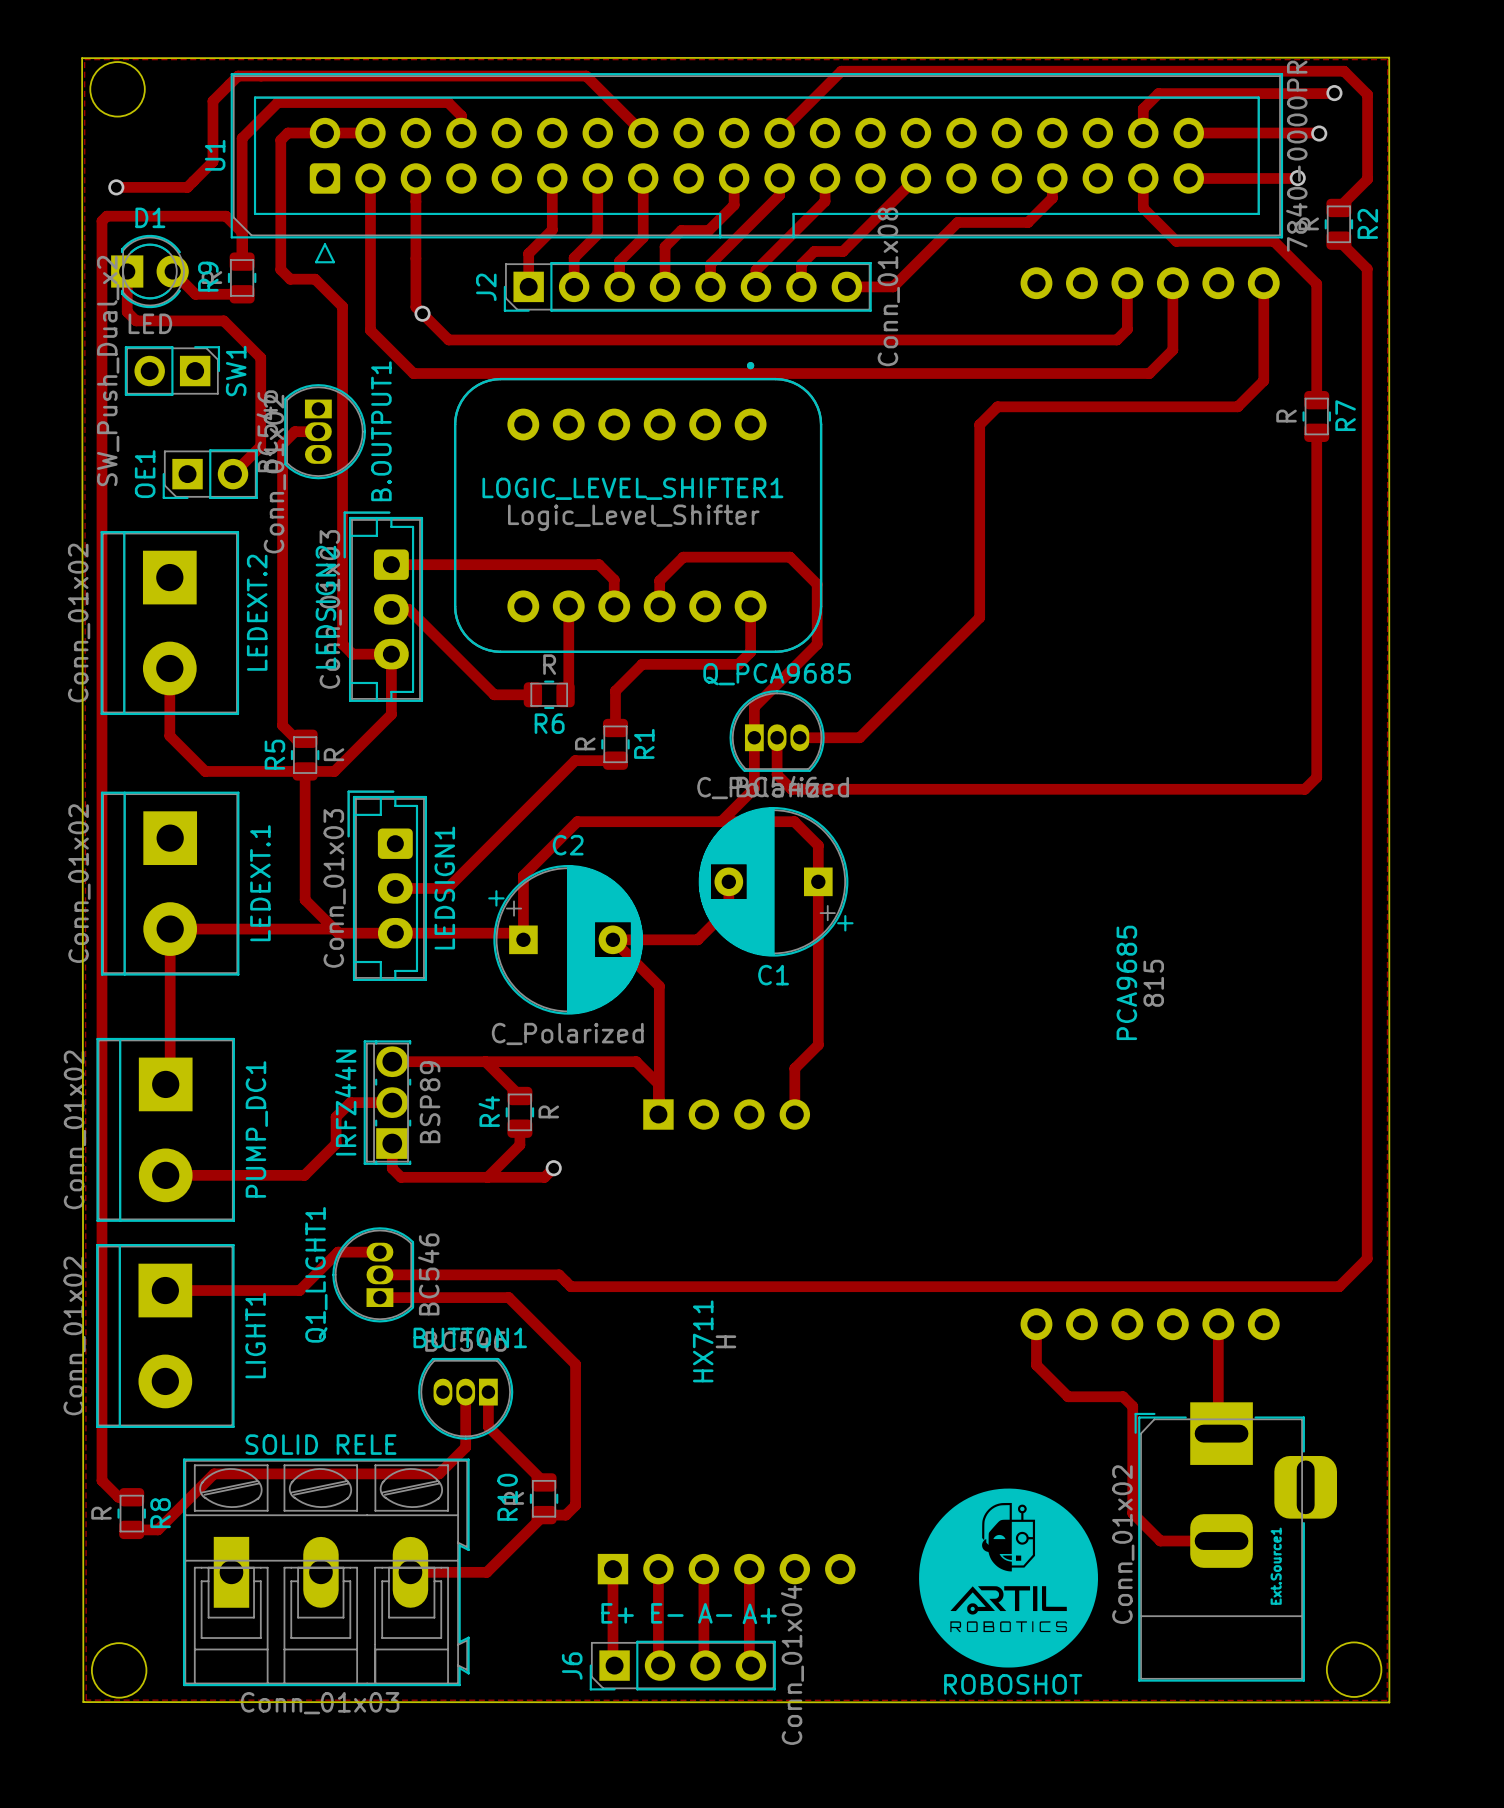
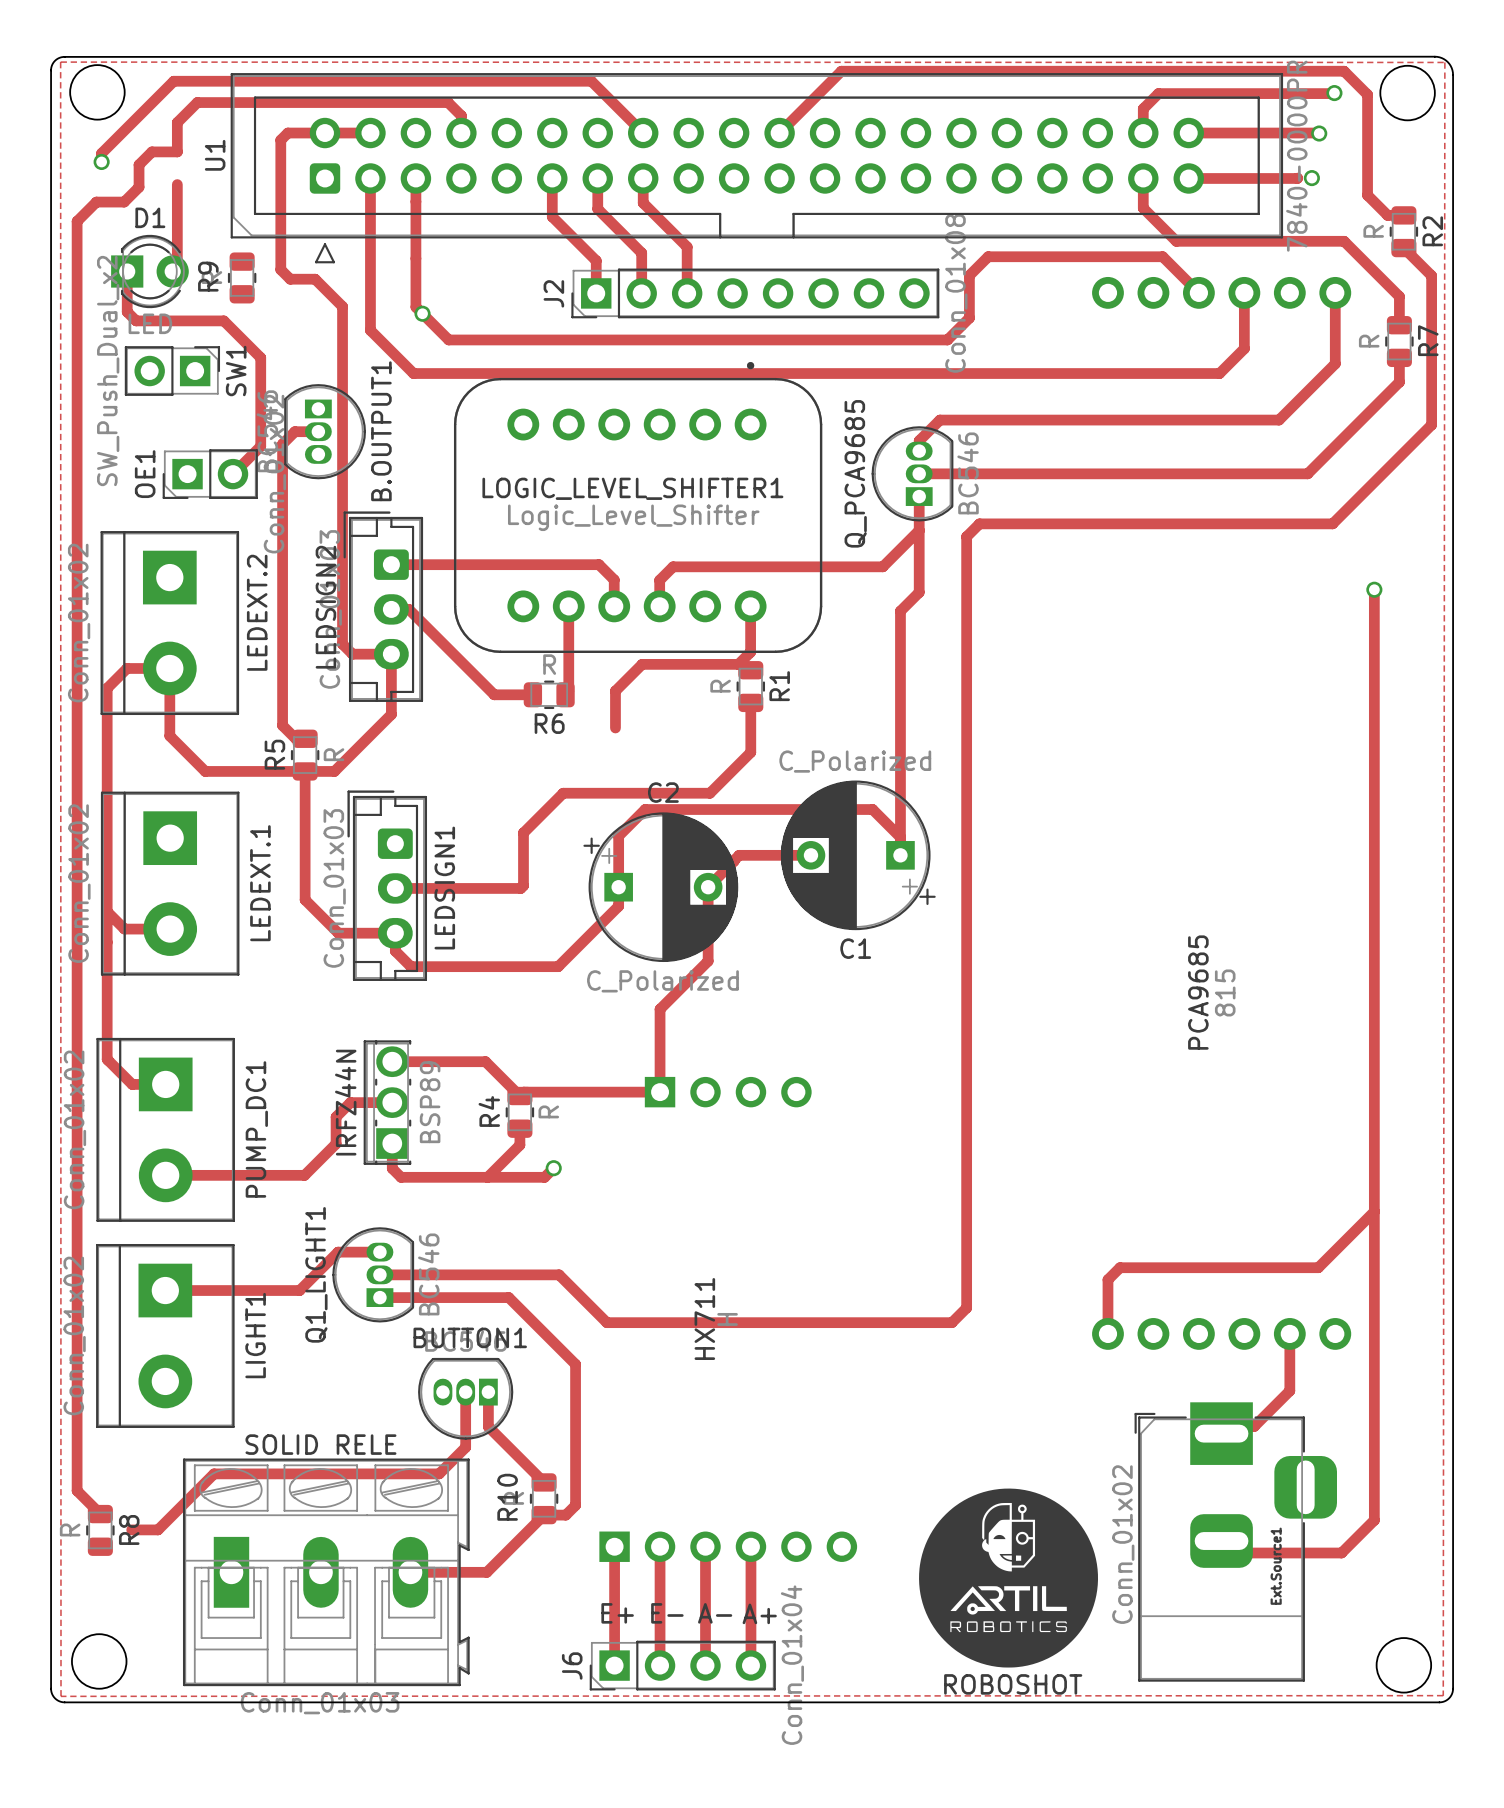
board edge: (1389, 57) (82, 58) (83, 1702) (1389, 1702) (1389, 57) -> (1434, 56) (64, 56) (54, 61) (51, 70) (51, 1688) (56, 1699) (64, 1702) (1439, 1702) (1450, 1697) (1453, 1688) (1453, 74) (1447, 62) (1434, 56)
zone outline: (84, 59) (86, 1700) (1387, 1700) (1387, 59) (84, 59) -> (60, 62) (61, 1696) (1443, 1695) (1444, 62) (60, 62)
round board edge: none -> [1379, 64, 1436, 122]
track: (591, 81) (586, 76) (238, 76) (212, 101) (212, 161) (187, 187) (116, 187) -> (591, 81) (173, 81) (101, 153) (101, 161)
round board edge position: (117, 89) -> (97, 92)
track: (277, 102) (242, 138) (242, 261) -> (277, 102) (197, 102) (177, 122) (177, 151) (151, 151) (139, 164) (139, 187) (124, 202) (96, 202) (77, 221) (77, 1490) (100, 1514)
track: (734, 178) (734, 205) (708, 230) (681, 230) (665, 246) (665, 286) -> none
track: (779, 178) (779, 195) (710, 264) (710, 286) -> none
track: (825, 178) (825, 201) (755, 270) (755, 286) -> none
track: (915, 178) (843, 251) (814, 251) (801, 264) (801, 286) -> none
track: (1052, 178) (1052, 198) (1028, 222) (957, 222) (893, 286) (846, 286) -> none
via position: (1297, 178) -> (1311, 178)
track: (1367, 179) (1338, 207) -> (1367, 179) (1367, 195) (1387, 215) (1403, 215)
via position: (116, 187) -> (101, 161)
track: (643, 203) (643, 237) (619, 261) (619, 286) -> (643, 203) (687, 246) (687, 293)
track: (597, 209) (597, 234) (574, 257) (574, 286) -> (597, 209) (641, 252) (641, 293)
track: (552, 216) (552, 229) (528, 253) (528, 286) -> (552, 216) (596, 260) (596, 293)
R2 position: (1338, 224) -> (1403, 231)
track: (242, 232) (226, 216) (106, 216) (101, 221) (101, 1480) (118, 1497) (131, 1497) -> none
track: (1338, 240) (1367, 268) (1367, 1258) (1339, 1286) (570, 1286) -> (1403, 248) (1431, 275) (1431, 424) (1332, 523) (979, 523) (966, 536) (966, 1307) (951, 1322) (606, 1322) (570, 1286)
track: (1273, 241) (1316, 284) (1316, 400) -> (1273, 241) (1344, 241) (1399, 296) (1399, 325)
track: (172, 271) (195, 294) (242, 294) -> (172, 271) (177, 266) (177, 184)
track: (1127, 283) (1127, 329) (1116, 339) (947, 339) -> (1198, 292) (1162, 256) (988, 256) (969, 275) (969, 318) (947, 339)
track: (1172, 283) (1172, 350) (1149, 373) -> (1244, 292) (1244, 348) (1219, 373) (1149, 373)
track: (1263, 283) (1263, 380) (1237, 406) (997, 406) (979, 424) (979, 617) (859, 737) (799, 737) -> none
J2 position: (687, 286) -> (755, 293)
track: none -> (1335, 292) (1335, 363) (1279, 420) (939, 420) (919, 440) (919, 451)
track: none -> (1399, 357) (1399, 382) (1307, 473) (919, 473)
R7 position: (1316, 416) -> (1399, 341)
track: (1316, 432) (1316, 777) (1304, 789) (791, 789) (777, 774) (777, 737) -> none
track: none -> (919, 496) (919, 592) (900, 611) (900, 855)
track: (659, 580) (683, 557) (789, 557) (817, 584) (817, 644) (754, 707) (754, 788) (721, 821) -> (659, 580) (673, 566) (882, 566) (919, 530)
track: none -> (1374, 589) (1374, 1520) (1341, 1553) (1248, 1553) (1229, 1533)
via: none -> (1374, 589)
Q_PCA9685 rotation: 0° (777, 731) -> 90° counterclockwise (912, 473)
Q_PCA9685 position: (777, 731) -> (912, 473)
R1 position: (615, 744) -> (750, 686)
track: (615, 760) (575, 760) (447, 888) -> none
PCA9685 position: (1150, 803) -> (1221, 813)
track: none -> (900, 837) (872, 809) (645, 809) (618, 836) (618, 906) (558, 966) (410, 966) (395, 951) (395, 933)
track: none -> (810, 855) (739, 855) (708, 887) (708, 961) (660, 1009) (660, 1092) (523, 1092) (519, 1096)
track: (523, 875) (577, 821) (794, 821) (818, 845) (818, 1045) (794, 1068) (794, 1114) -> (523, 875) (523, 832) (563, 793) (709, 793) (750, 752) (750, 702)
track: (728, 881) (728, 908) (697, 939) (612, 939) (659, 986) (658, 1100) -> none
C1 position: (776, 881) -> (858, 855)
track: (523, 885) (523, 939) (516, 933) (395, 933) -> (523, 885) (520, 888) (447, 888)
track: none -> (107, 911) (124, 929) (170, 929)
track: (334, 929) (170, 929) (170, 1079) (165, 1084) -> (169, 668) (127, 668) (107, 688) (107, 1059) (132, 1084) (165, 1084)
C2 position: (565, 939) -> (660, 887)
track: (485, 1061) (636, 1061) (658, 1083) (658, 1114) -> none
track: none -> (1374, 1211) (1318, 1267) (1120, 1267) (1107, 1279) (1107, 1333)
track: (1036, 1324) (1036, 1365) (1068, 1396) (1123, 1396) (1132, 1406) (1132, 1513) (1160, 1541) (1221, 1541) -> none
track: (1218, 1324) (1218, 1430) (1221, 1433) -> none
track: none -> (1289, 1333) (1289, 1390) (1254, 1426) (1229, 1426)
HX711 position: (726, 1341) -> (728, 1319)
R8 position: (131, 1513) -> (100, 1530)
track: (612, 1569) (612, 1663) (614, 1665) -> (614, 1546) (614, 1665)
track: (658, 1569) (658, 1663) (660, 1665) -> (660, 1546) (660, 1665)
track: (703, 1569) (703, 1663) (705, 1665) -> (705, 1546) (705, 1665)
track: (749, 1569) (749, 1663) (750, 1665) -> (750, 1546) (750, 1665)
round board edge position: (1354, 1669) -> (1403, 1665)
round board edge position: (119, 1670) -> (99, 1661)

